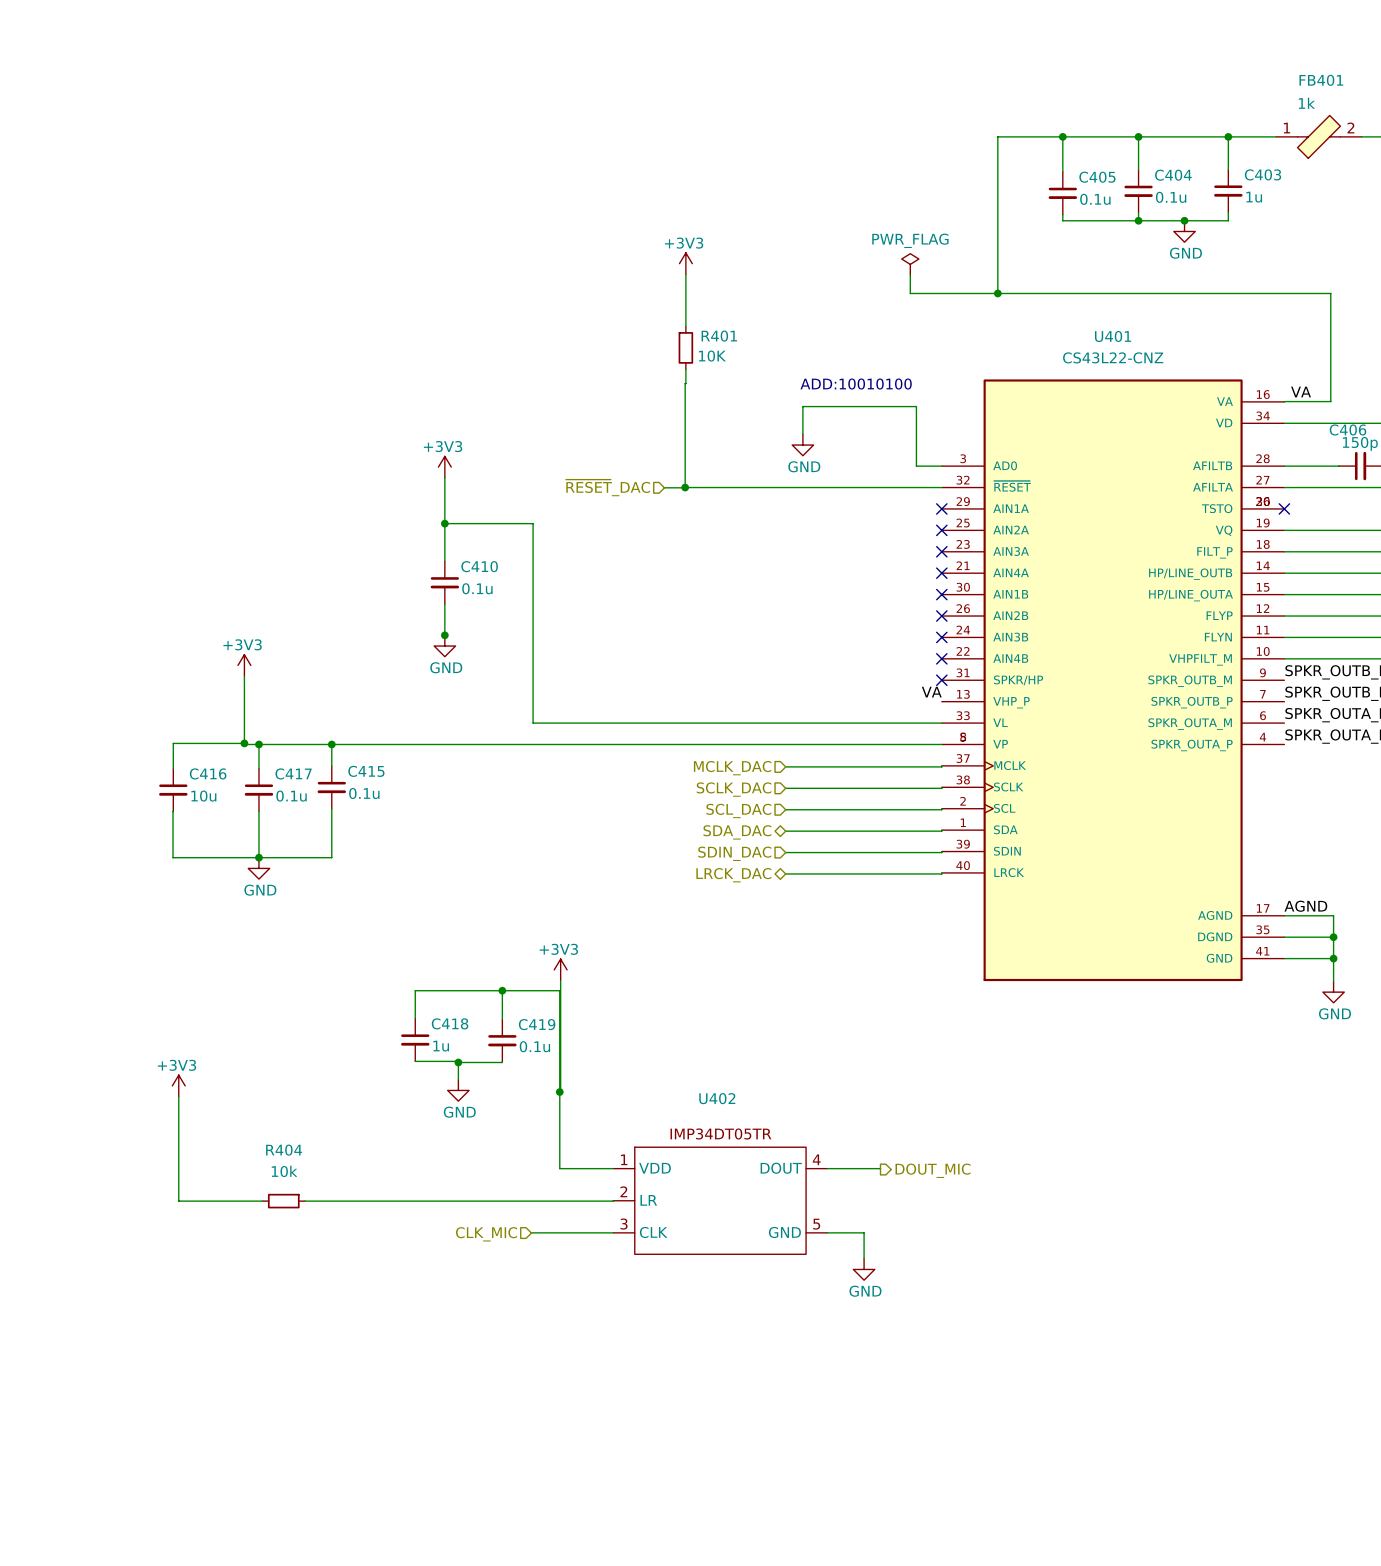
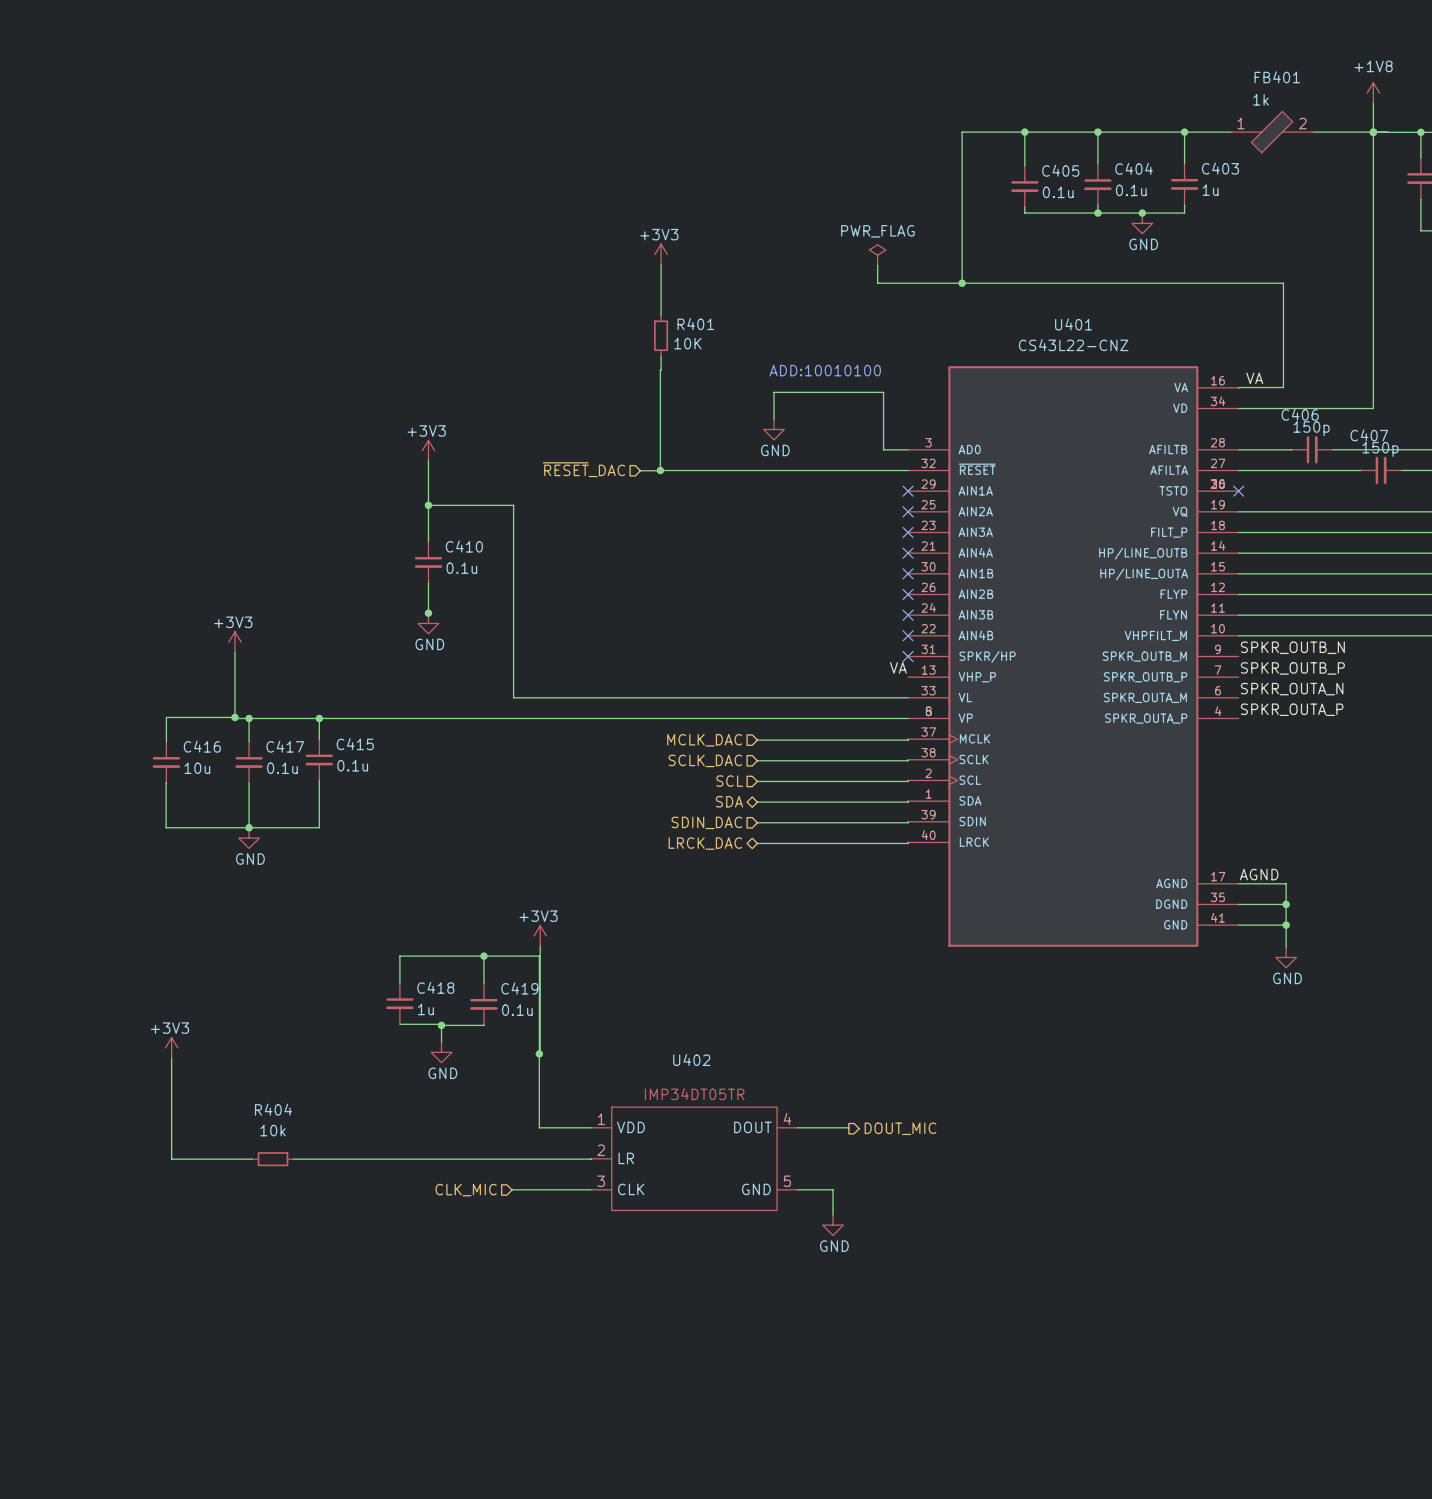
hierarchical label: SCL_DAC (738, 810) -> SCL (729, 781)
hierarchical label: SDA_DAC (737, 832) -> SDA (729, 801)

